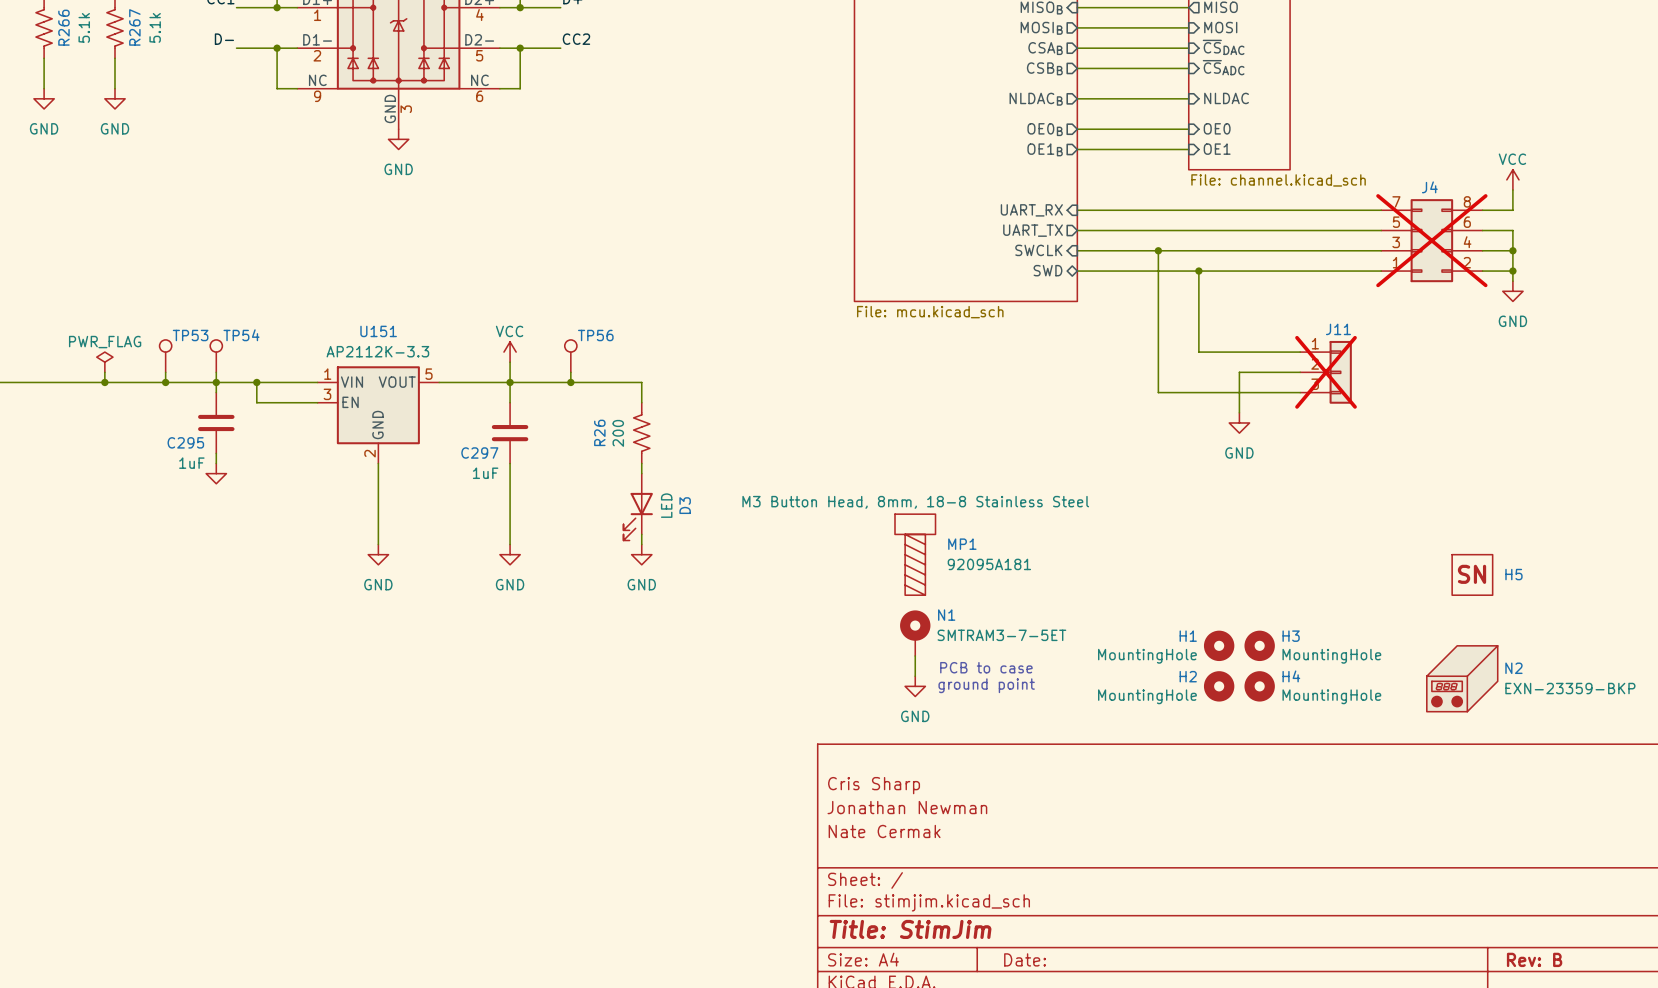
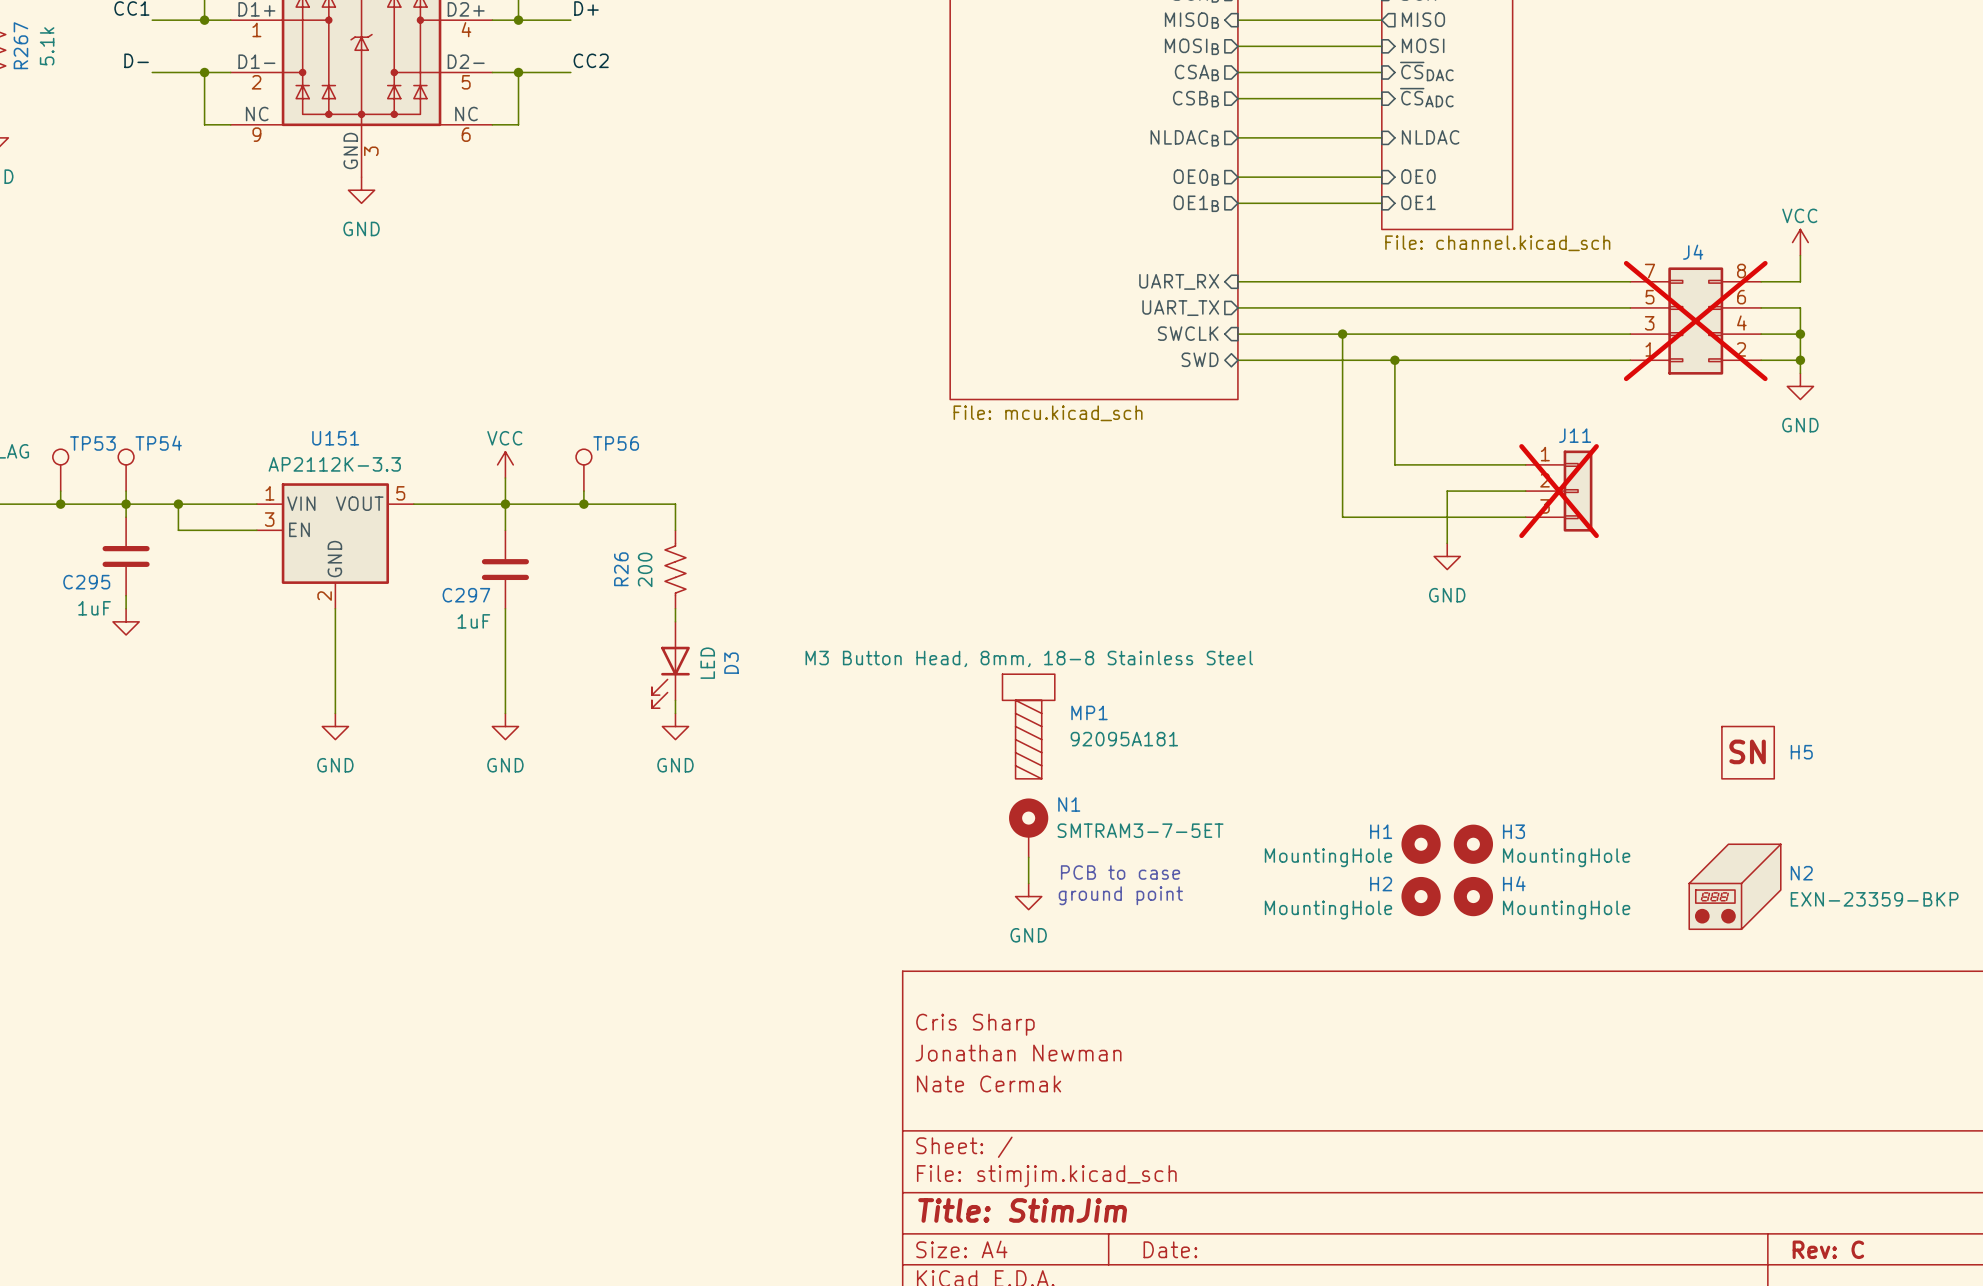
title block: Rev: B (1534, 959) -> Rev: C (1828, 1249)

